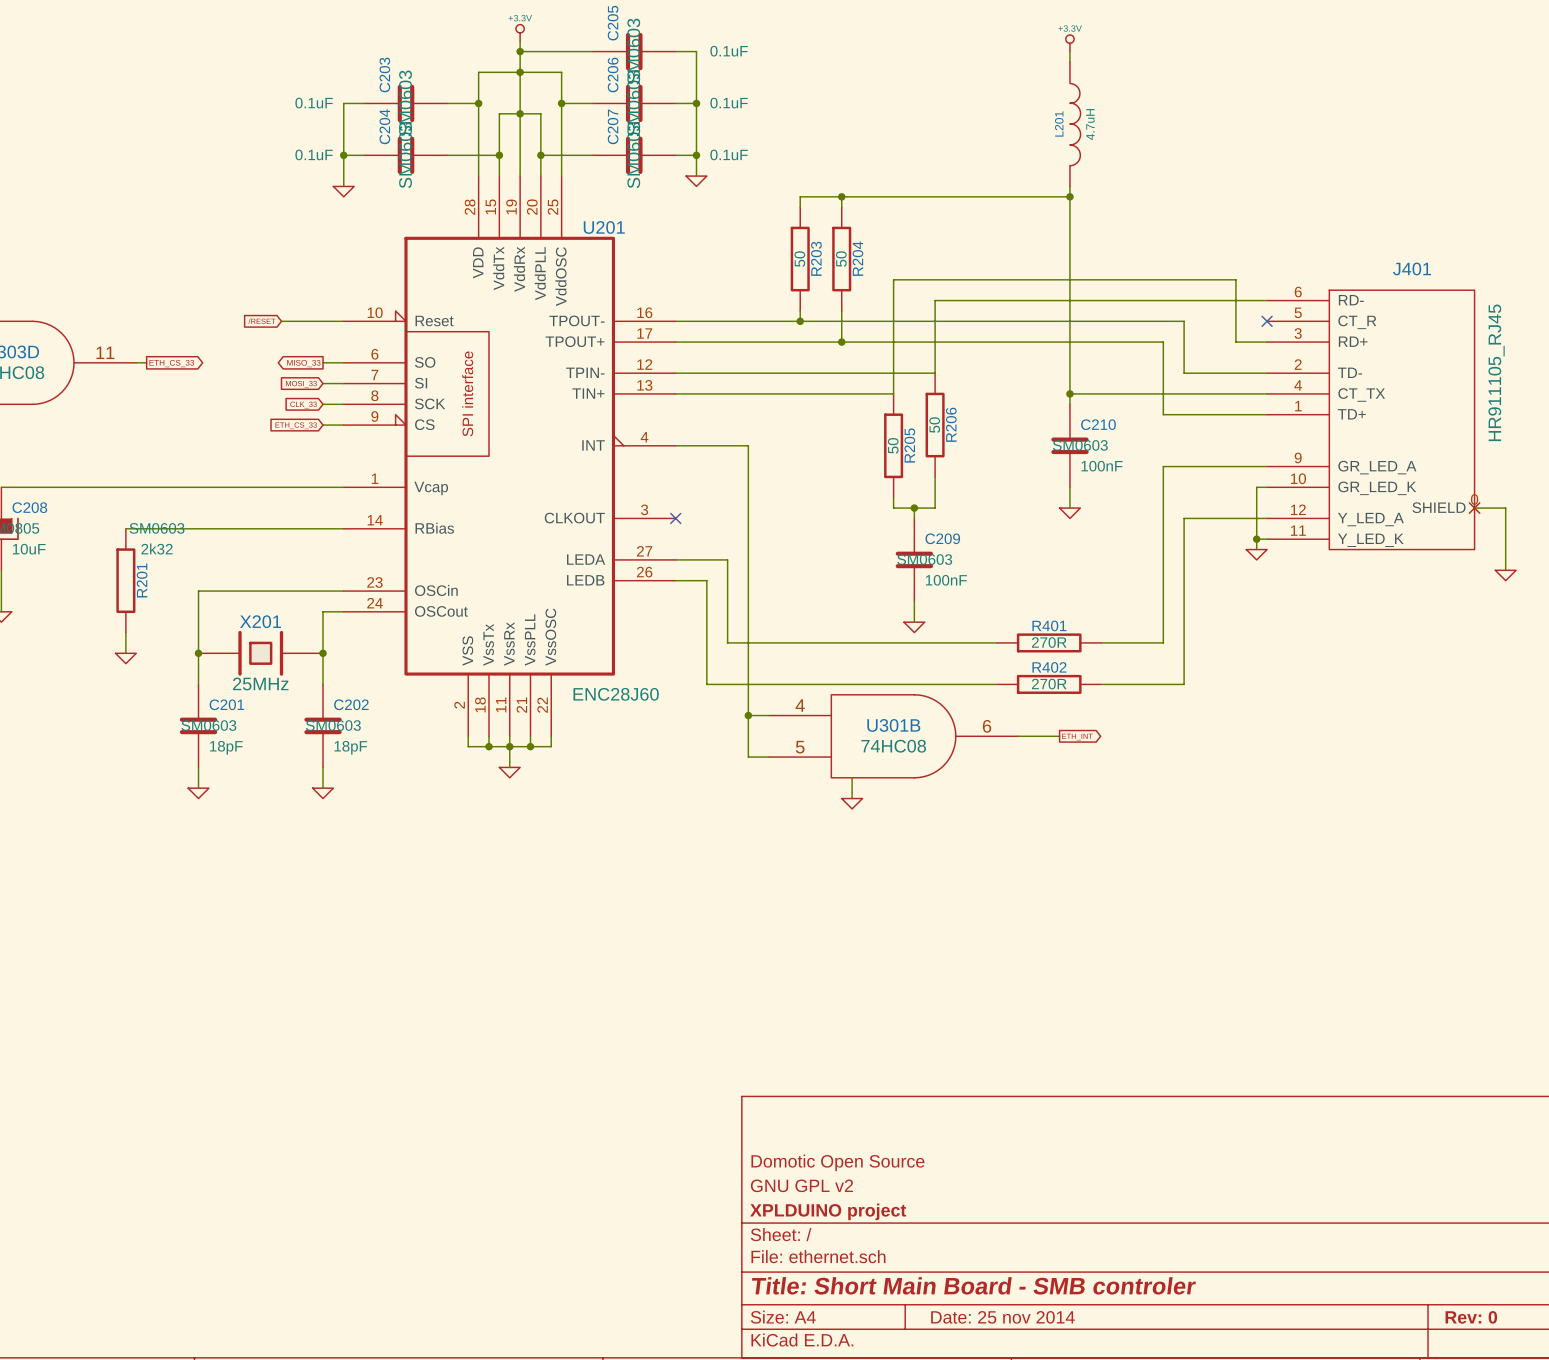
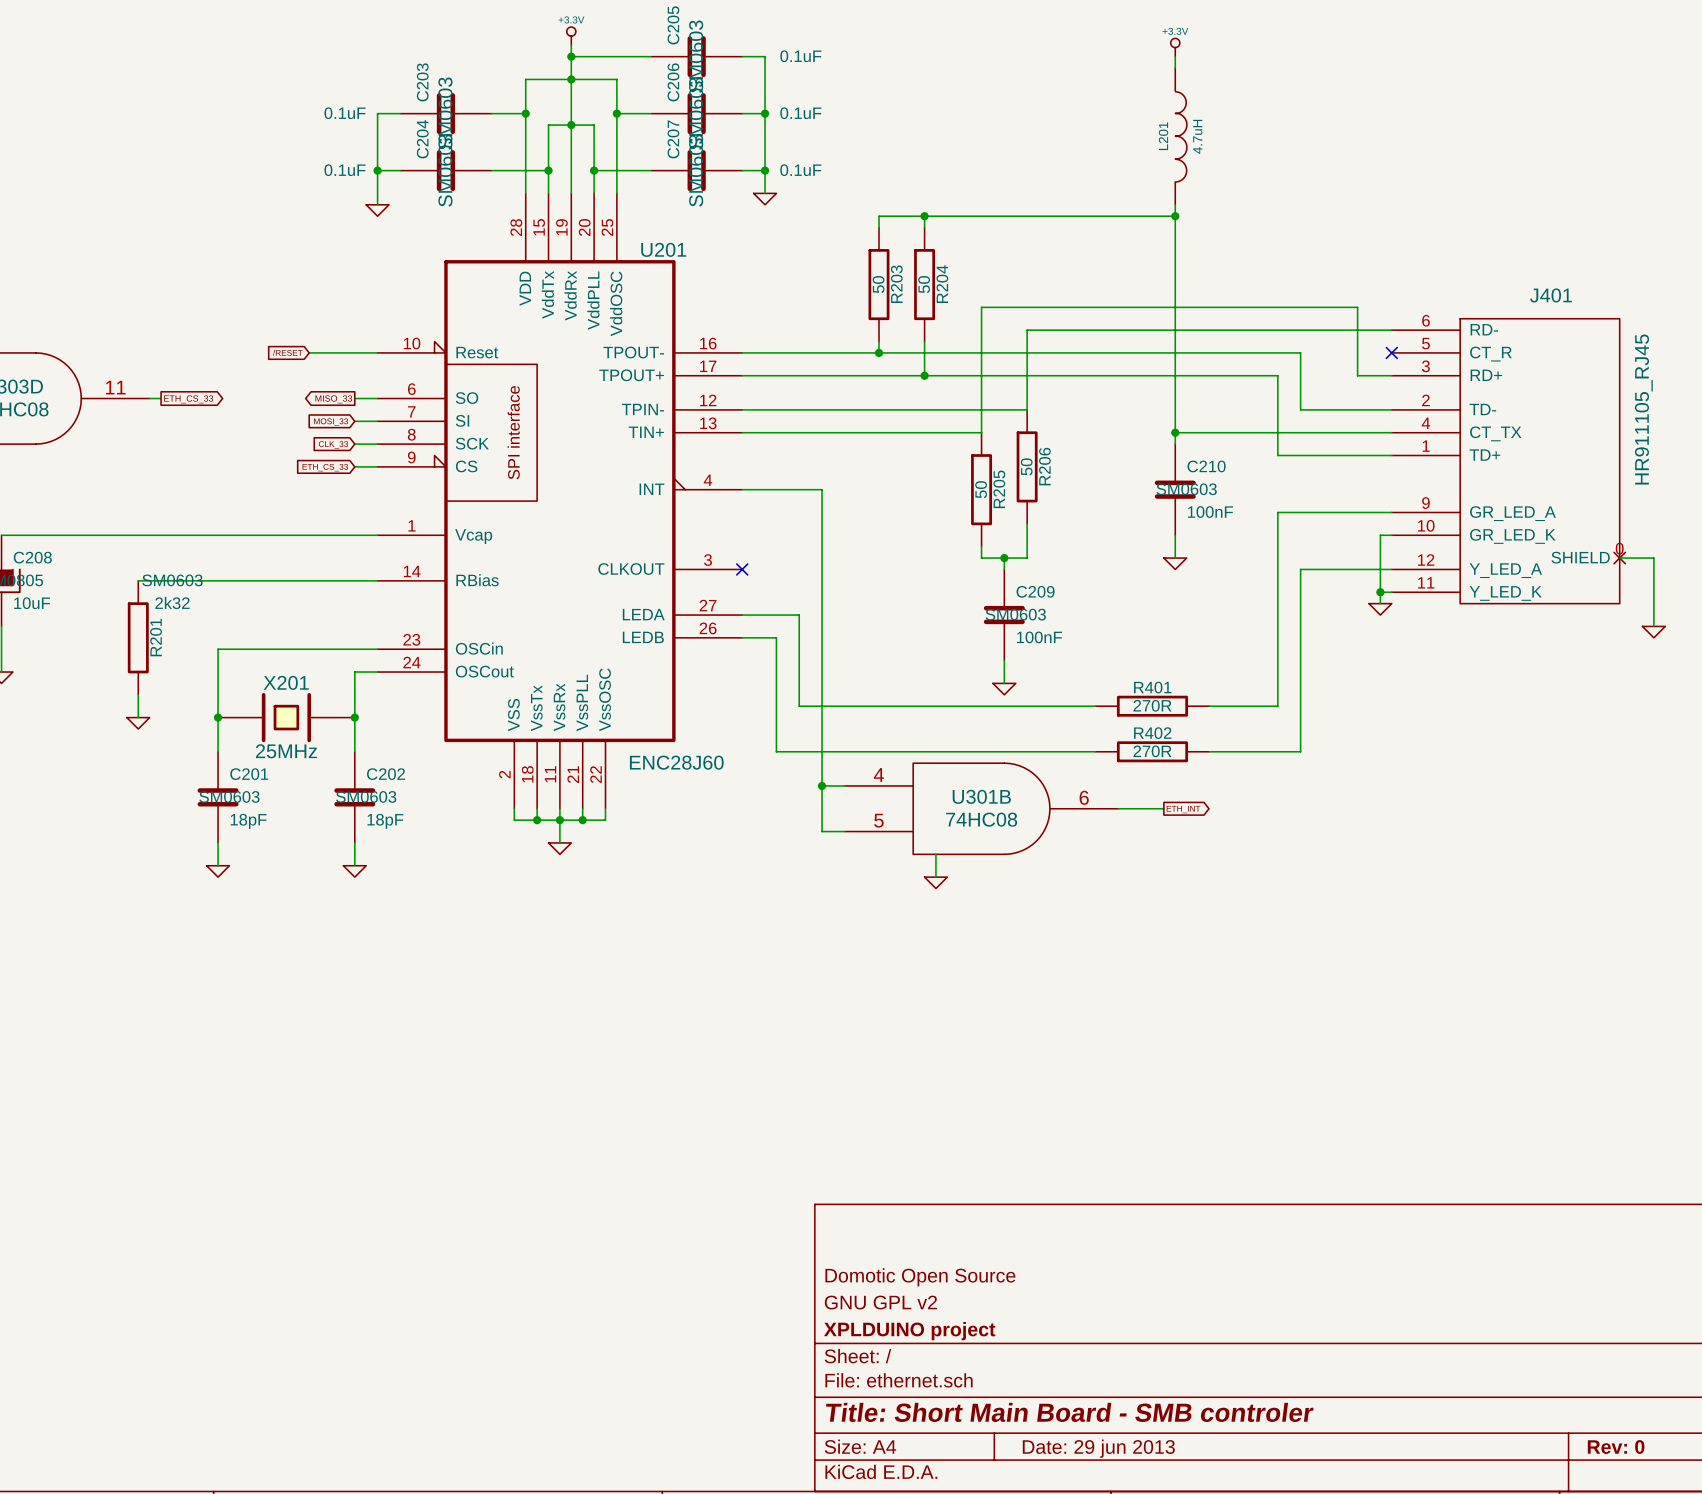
title block: Date: 25 nov 2014 (1002, 1317) -> Date: 29 jun 2013 (1098, 1448)

